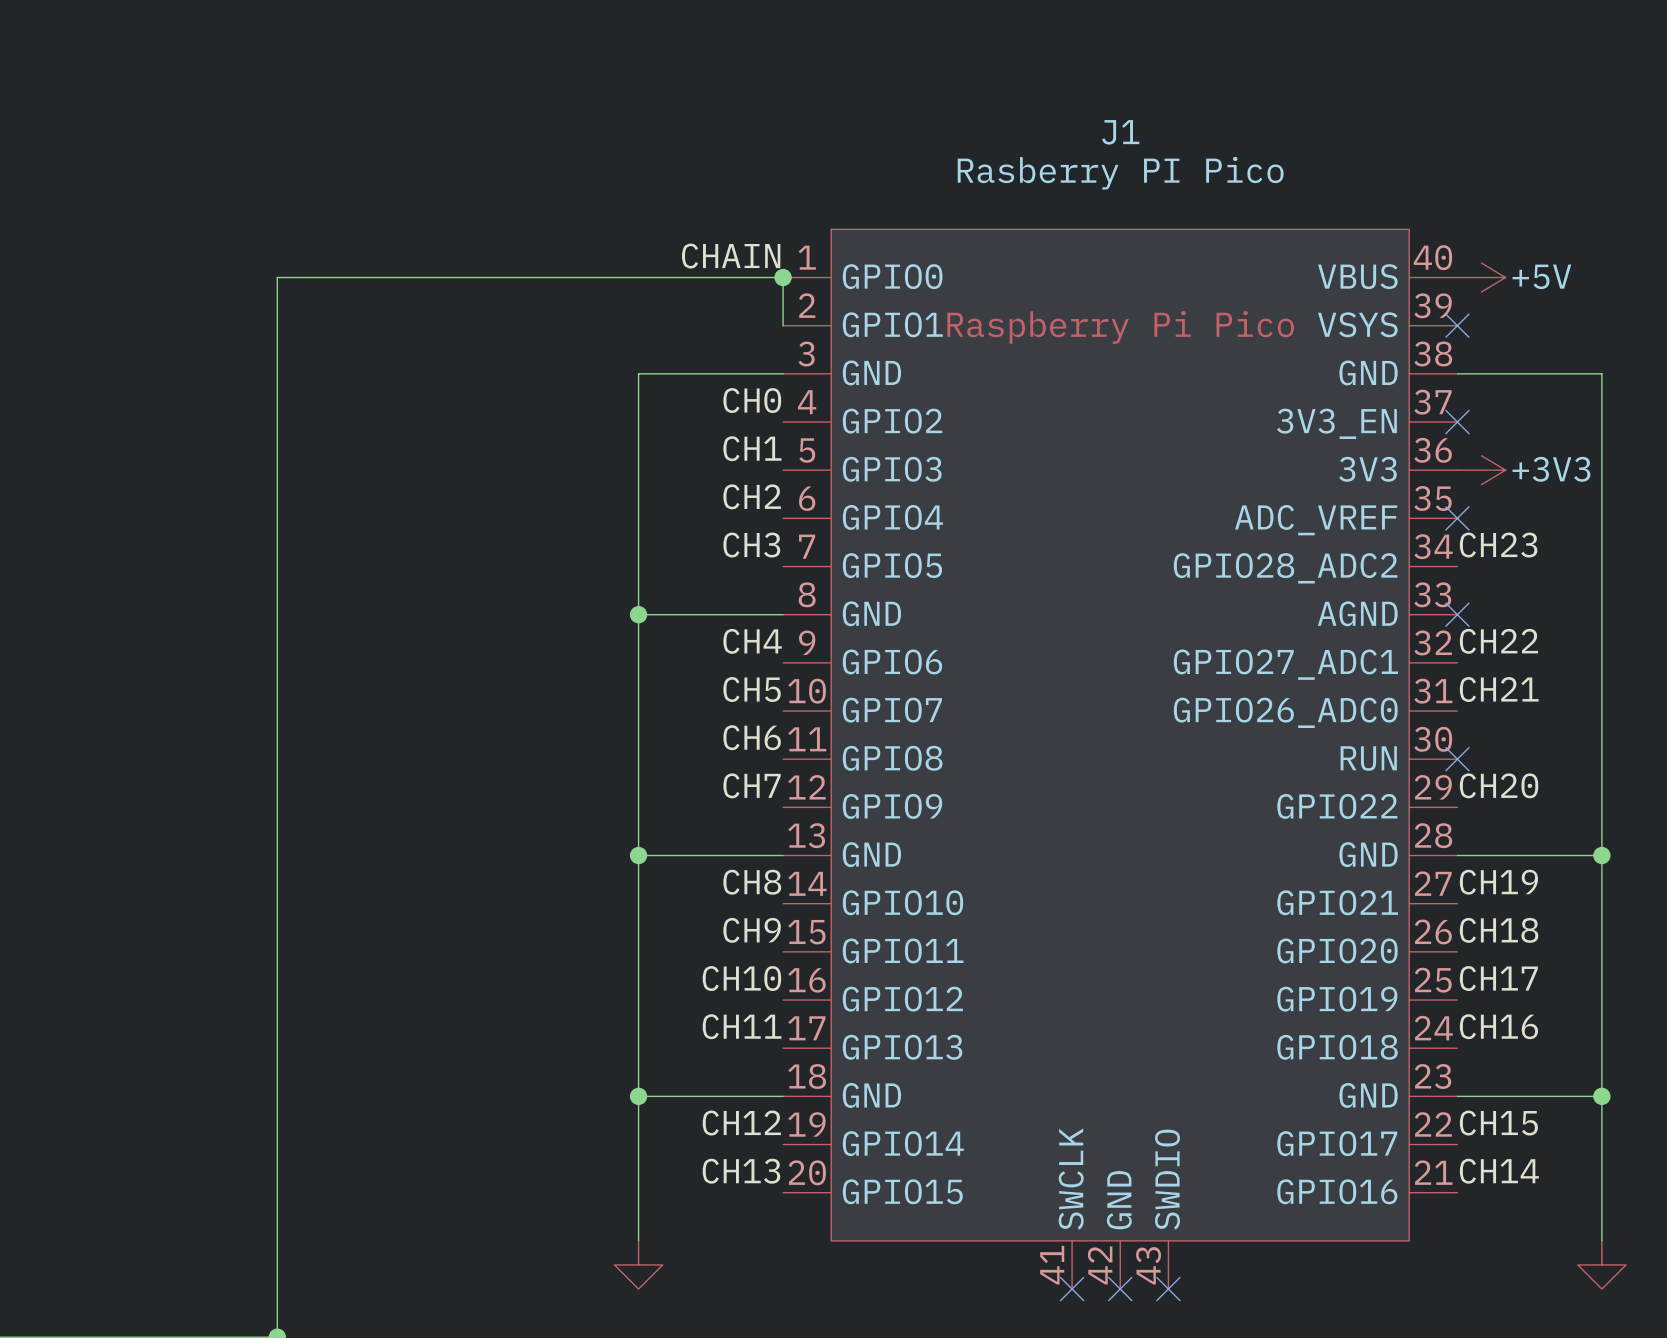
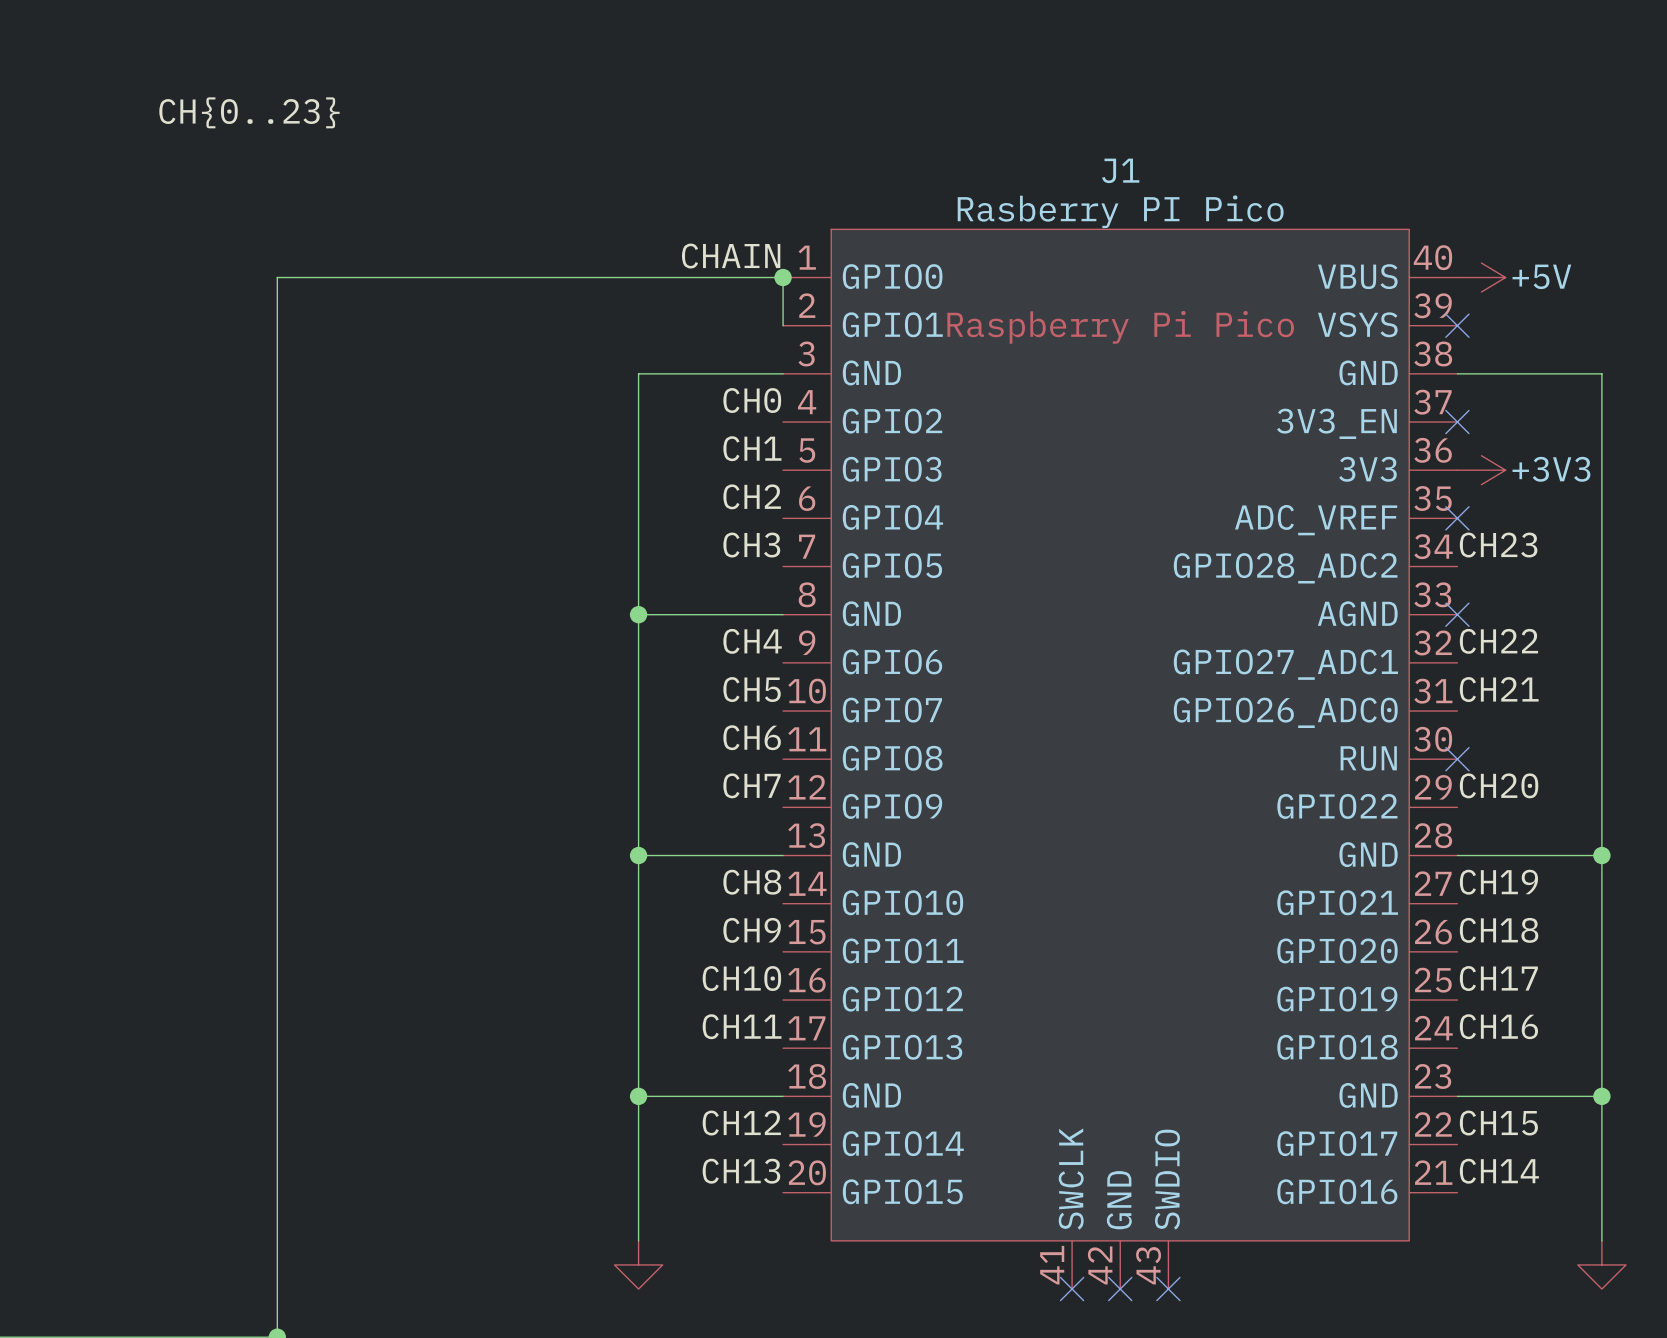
label: none -> CH{0..23} (249, 112)
J1 name position: J1 (1120, 132) -> J1 (1120, 170)
J1 value position: Rasberry PI Pico (1120, 173) -> Rasberry PI Pico (1120, 211)

